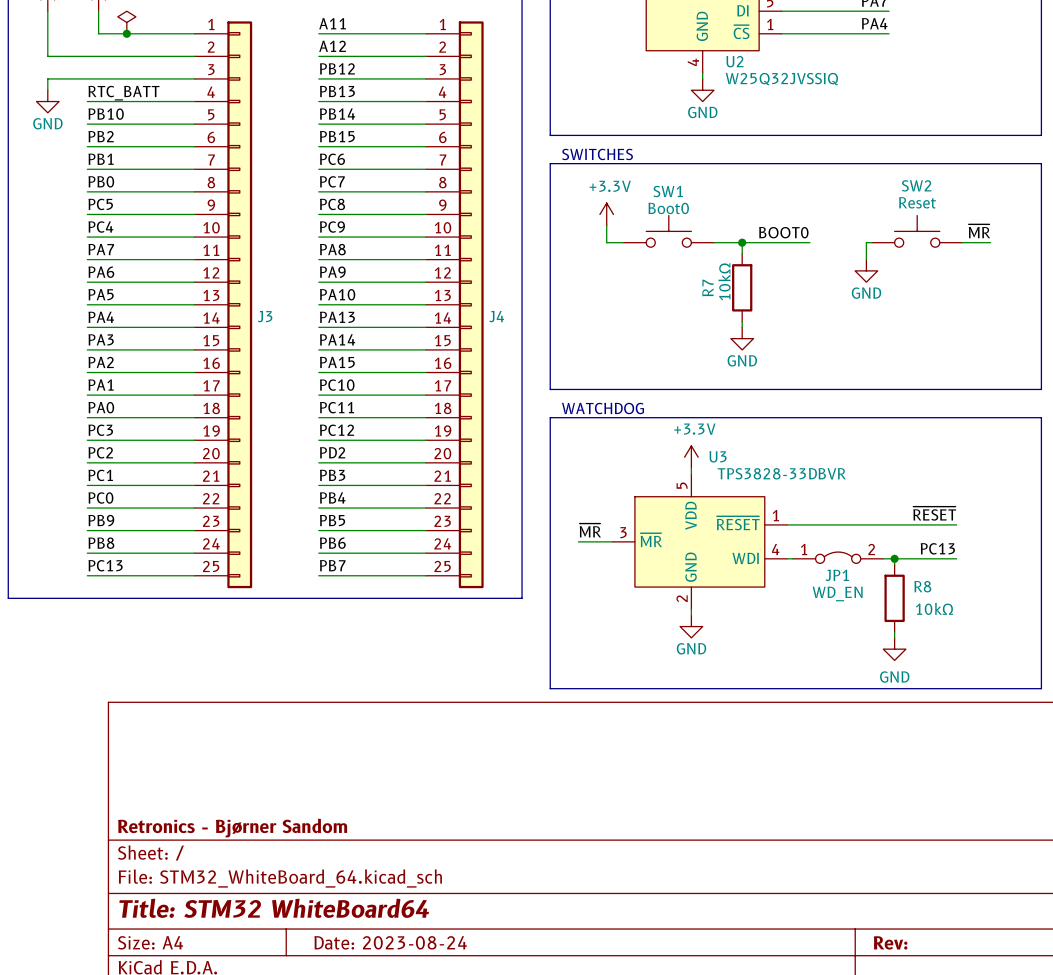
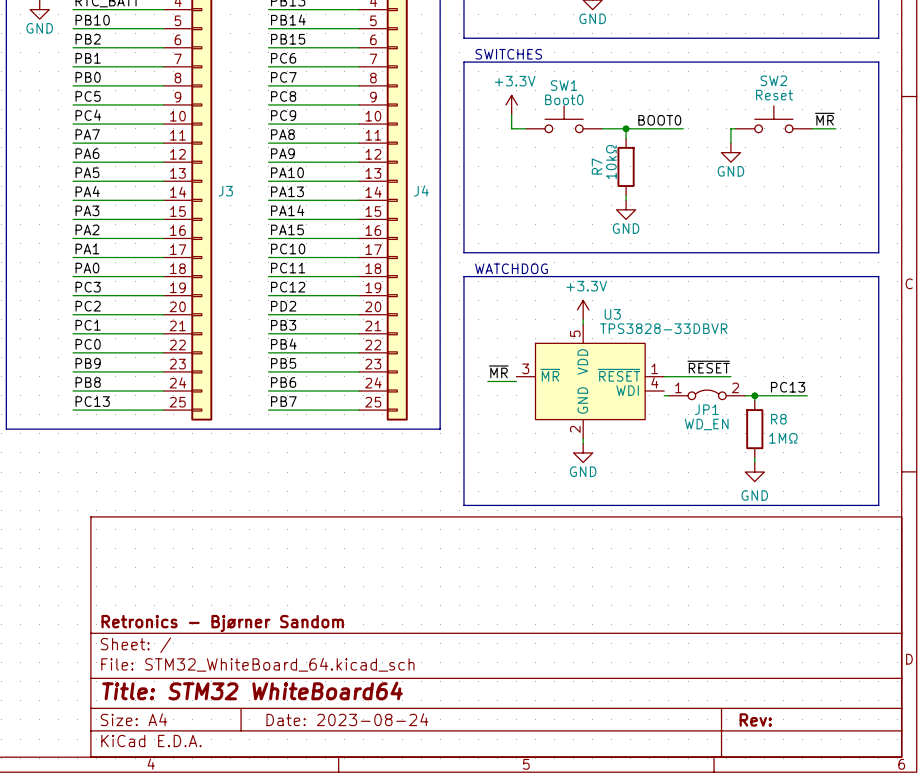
U3 symbol: [612, 474, 788, 610] -> [516, 324, 665, 439]
label position: ~{RESET} (934, 513) -> ~{RESET} (708, 367)
wire: (787, 524) (956, 524) -> none
wire: none -> (664, 376) (730, 376)
R8 value: 10kΩ (934, 608) -> 1MΩ (783, 438)

